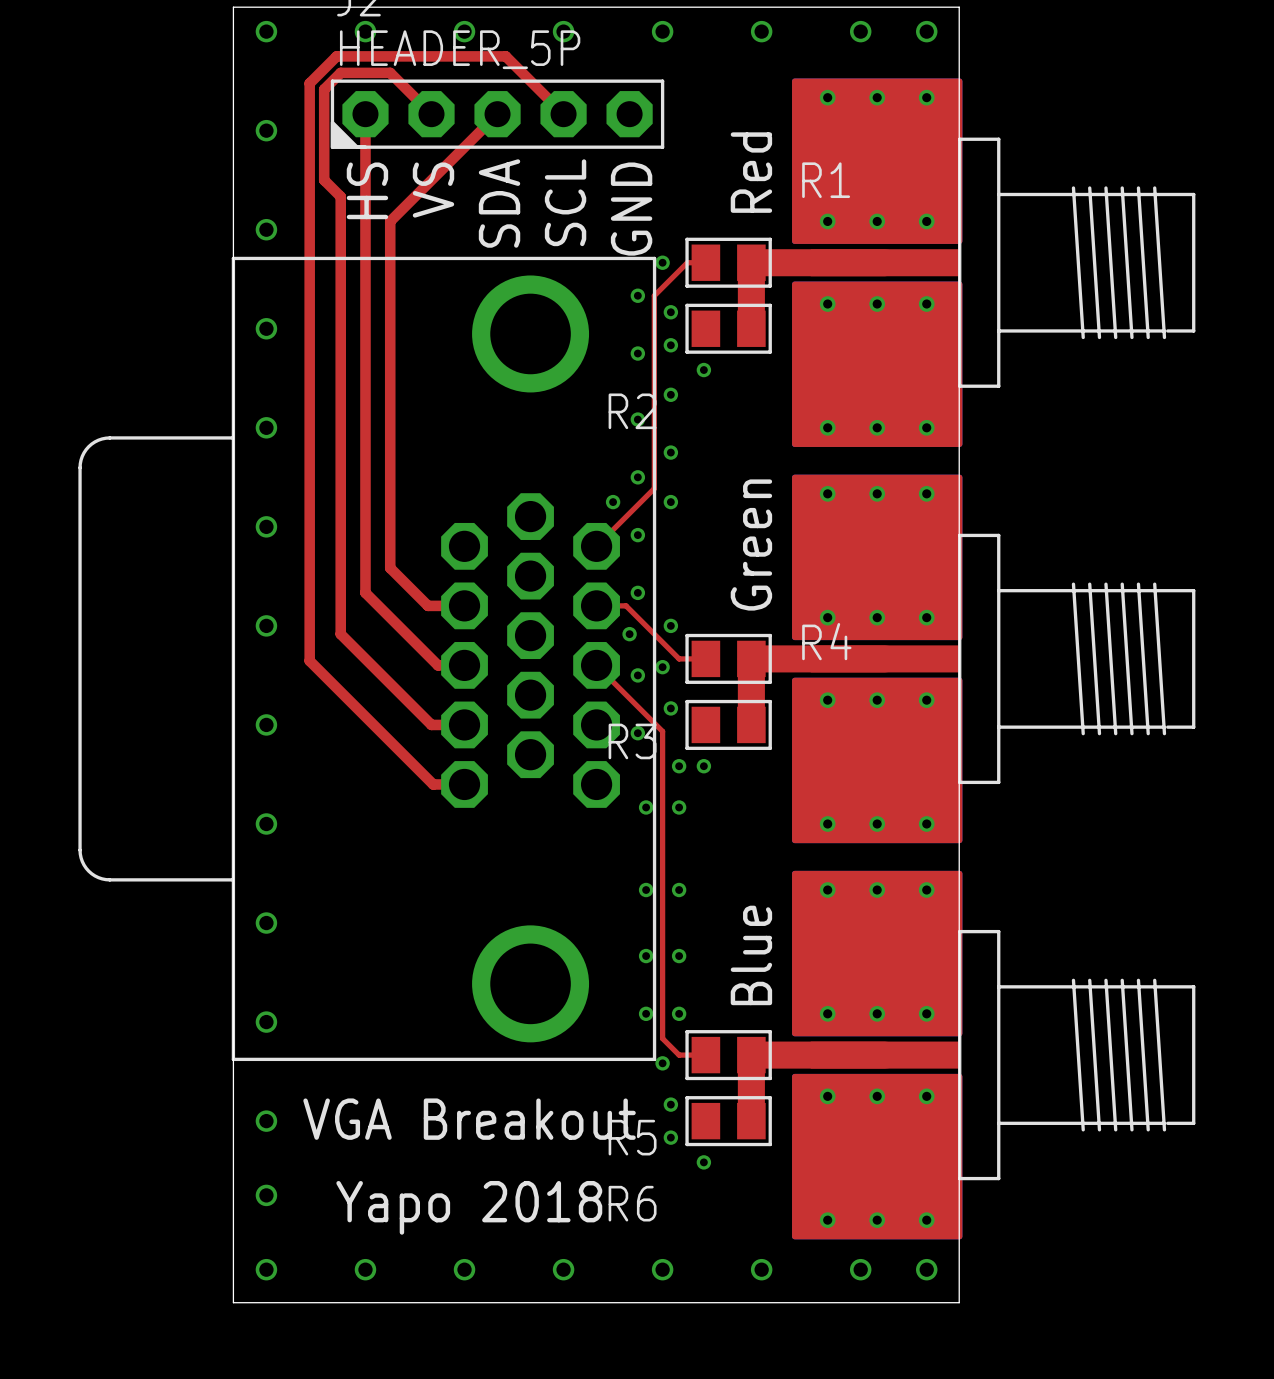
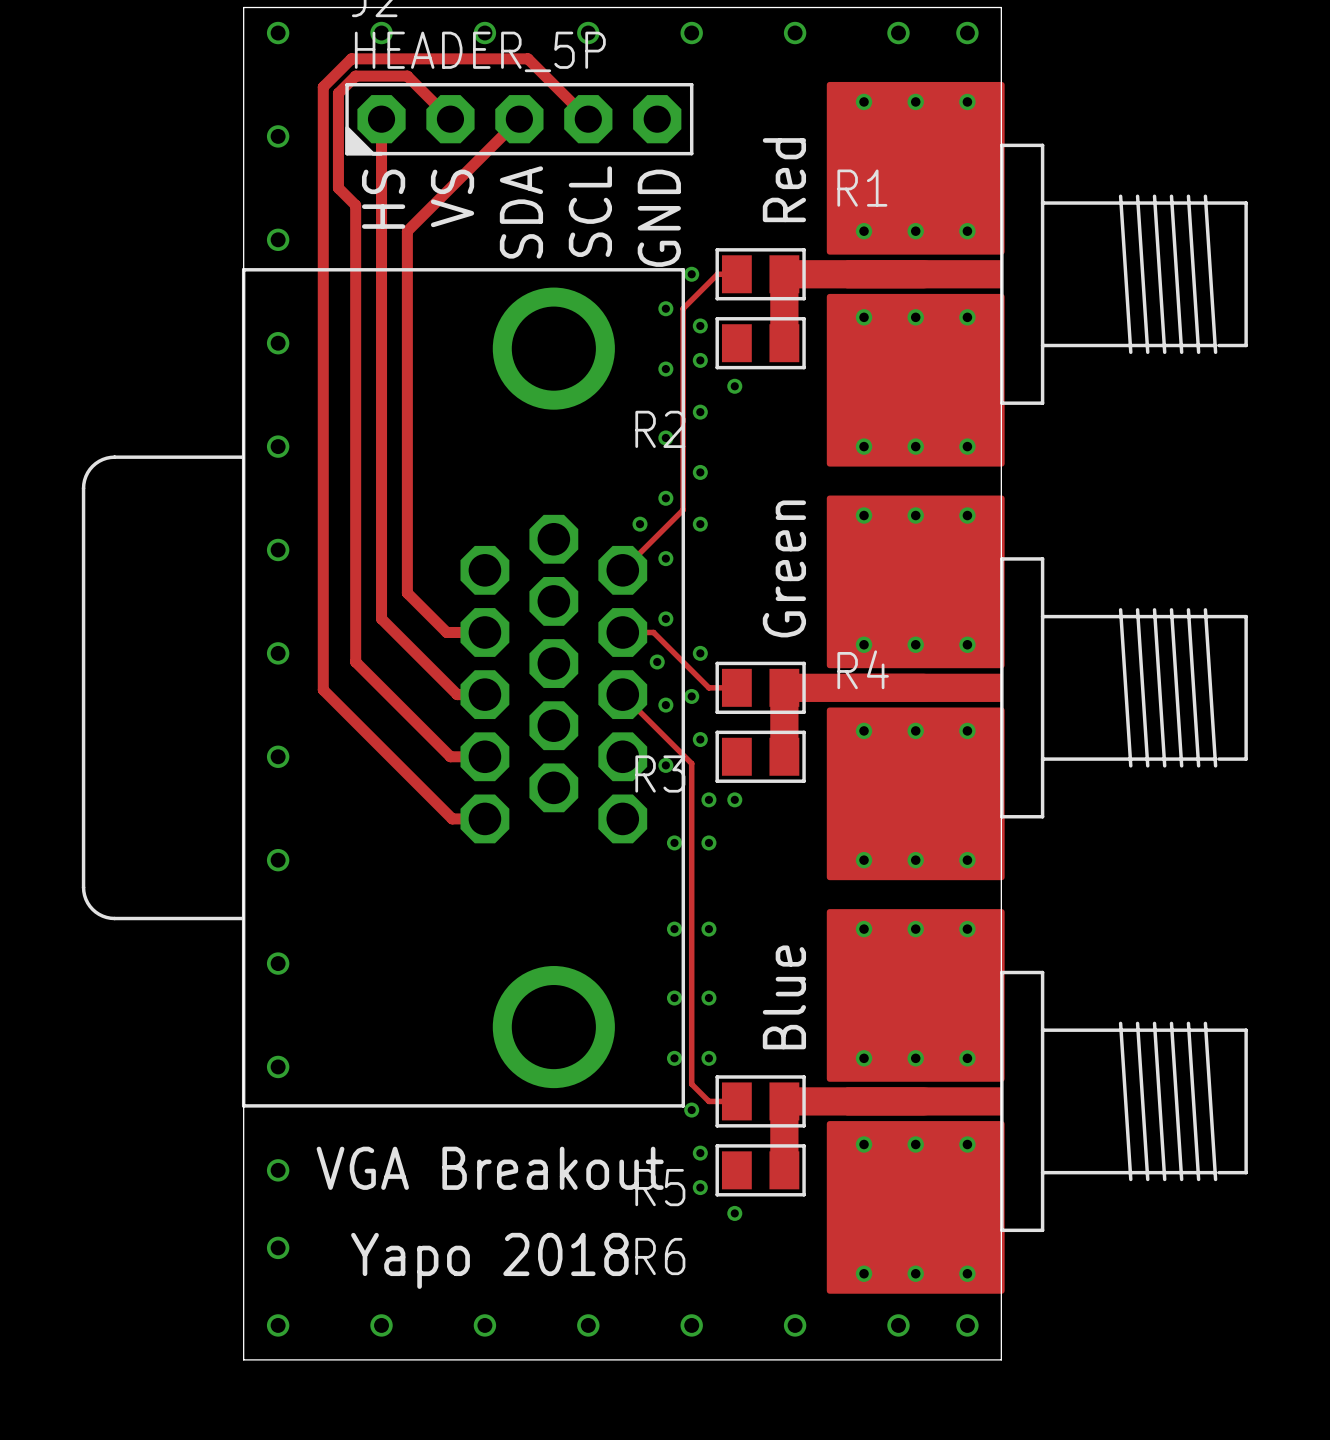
part footprint: [792, 78, 1196, 447] -> [826, 81, 1248, 467]
part footprint: [792, 474, 1196, 844] -> [826, 495, 1248, 881]
part footprint: [792, 870, 1196, 1240] -> [826, 909, 1248, 1294]

